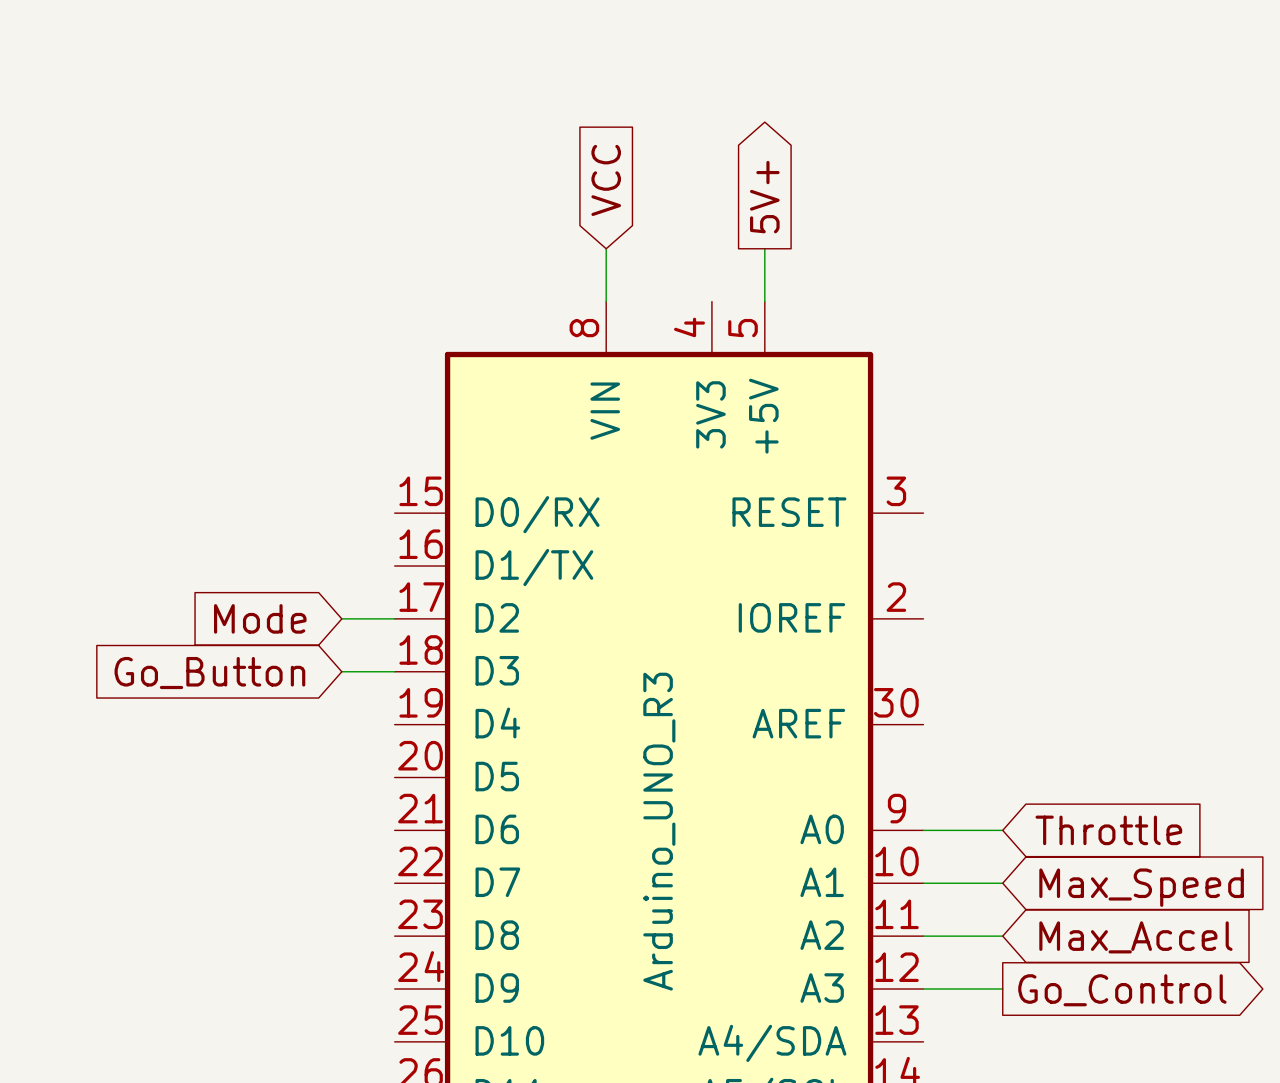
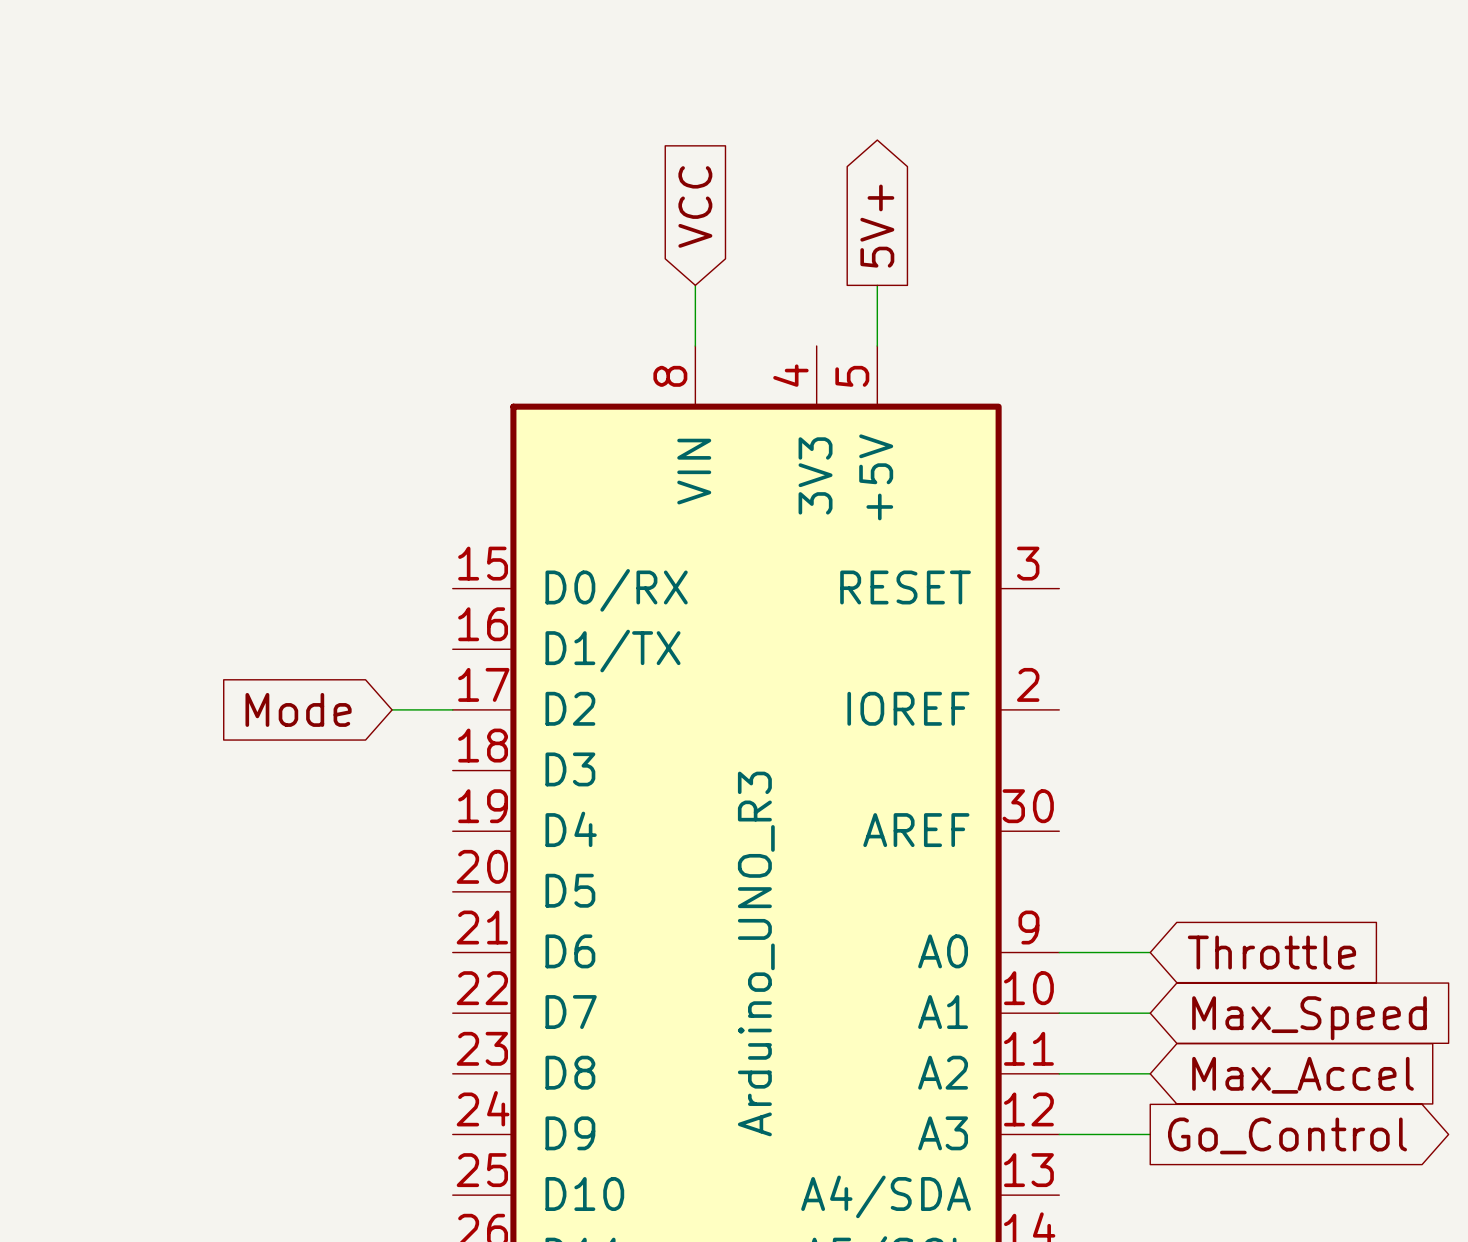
wire: (341, 671) (394, 671) -> none
global label: Go_Button (209, 673) -> none

